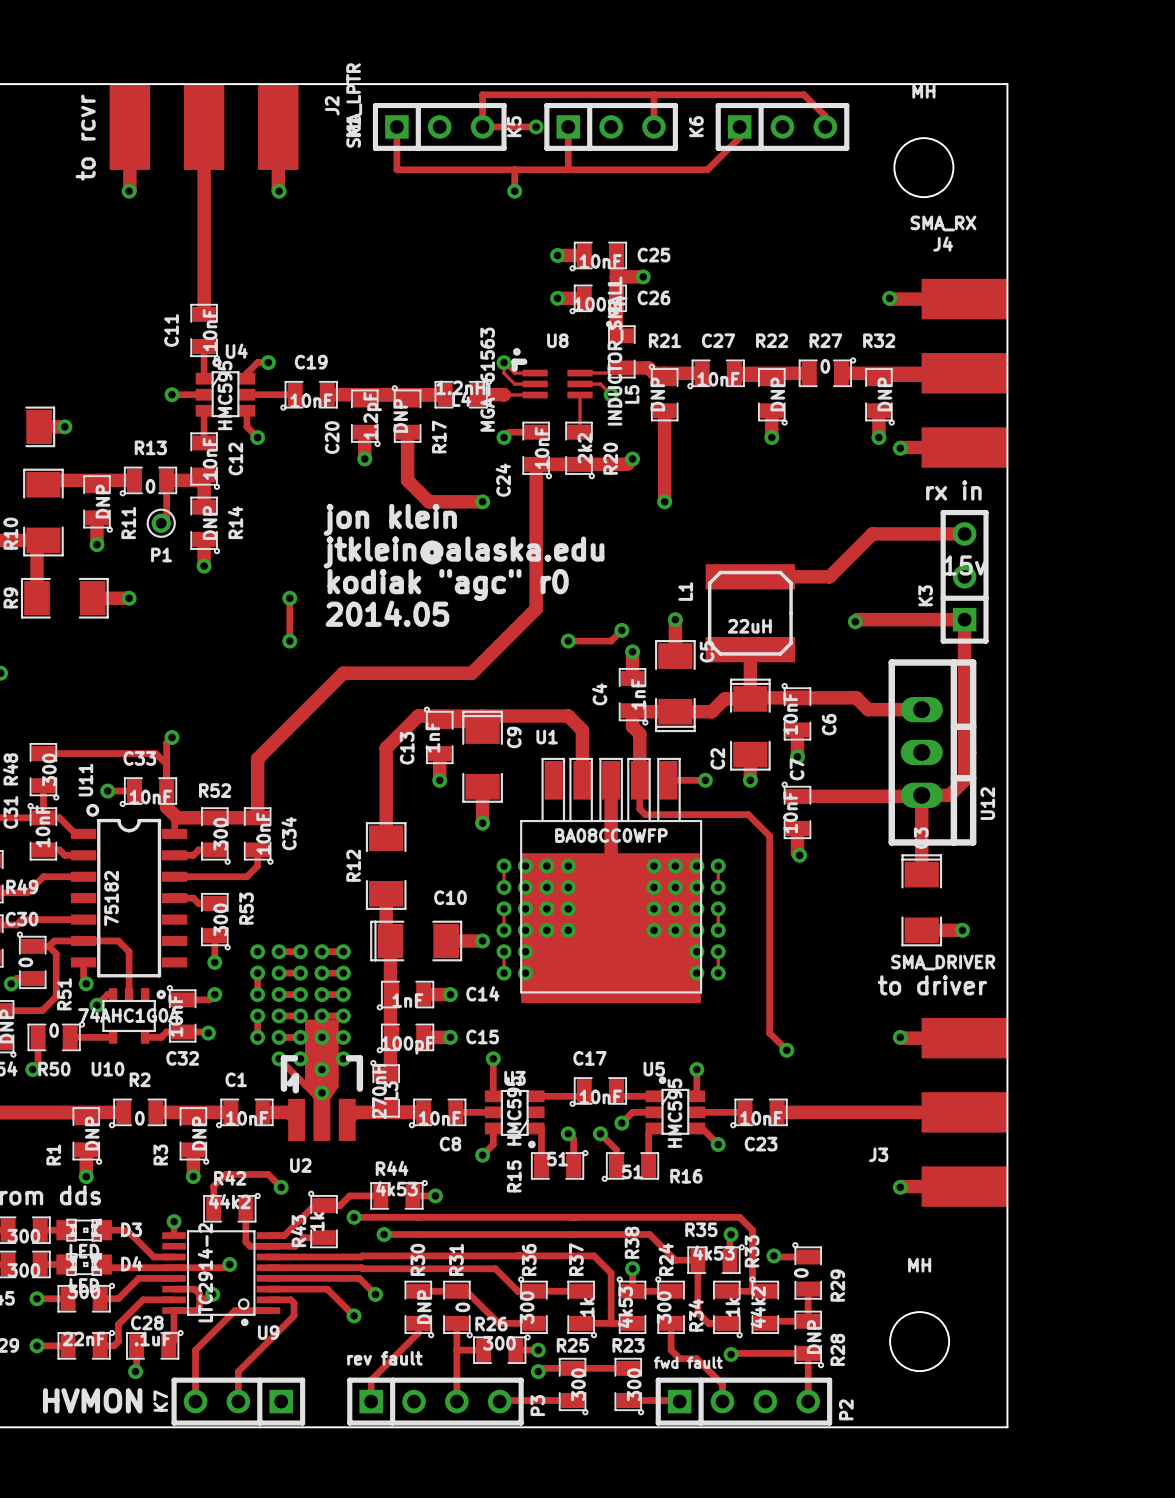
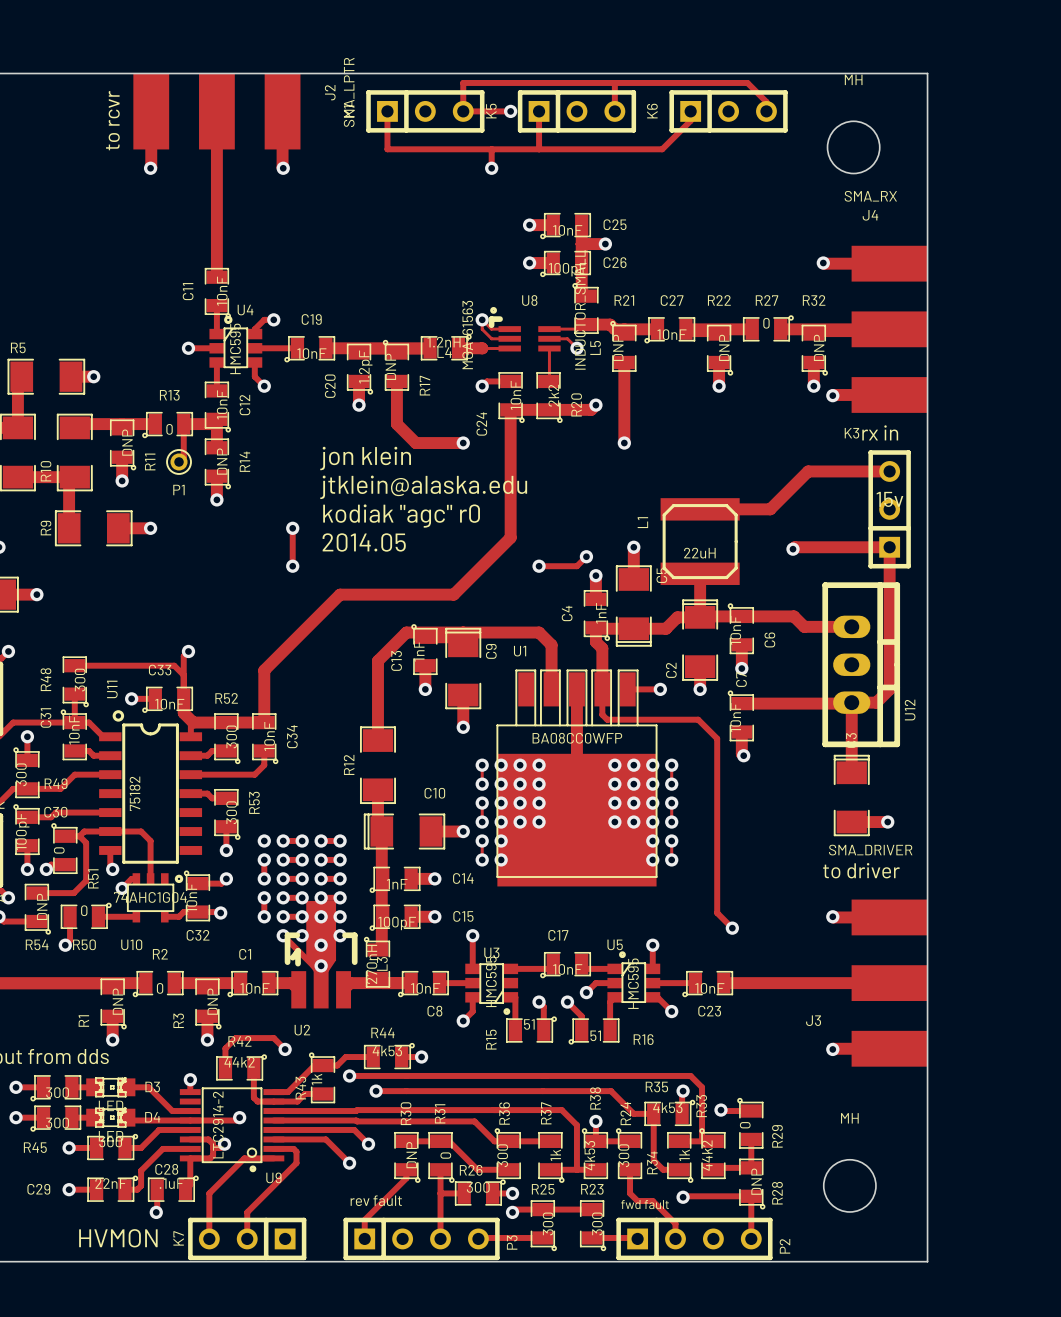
K3 name rotation: 0° (925, 595) -> 90° clockwise (851, 433)
K3 name position: K3 (925, 595) -> K3 (851, 433)

